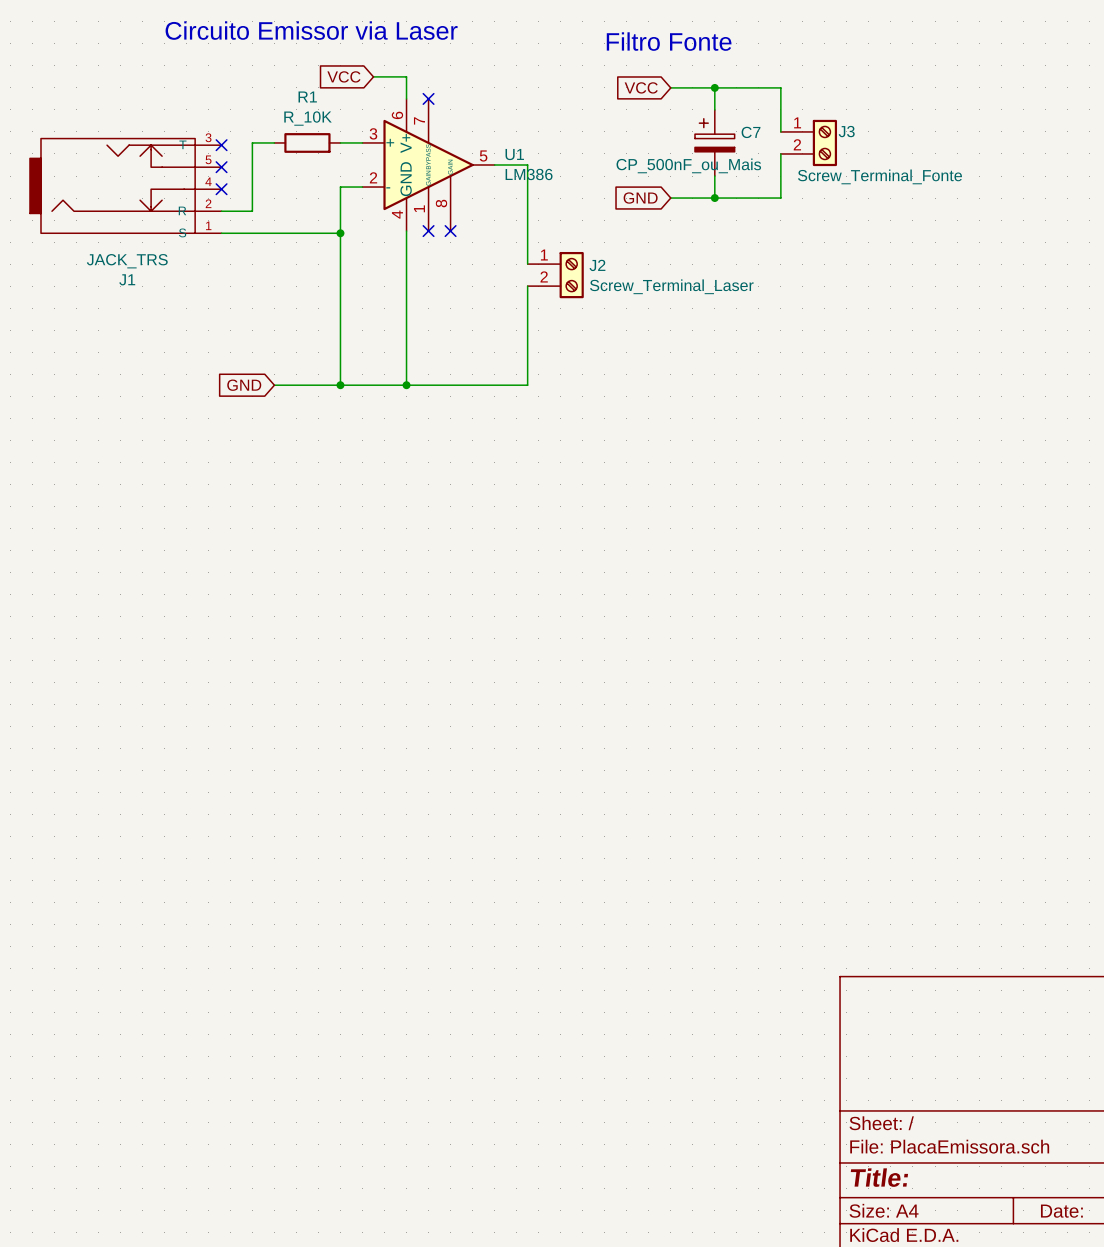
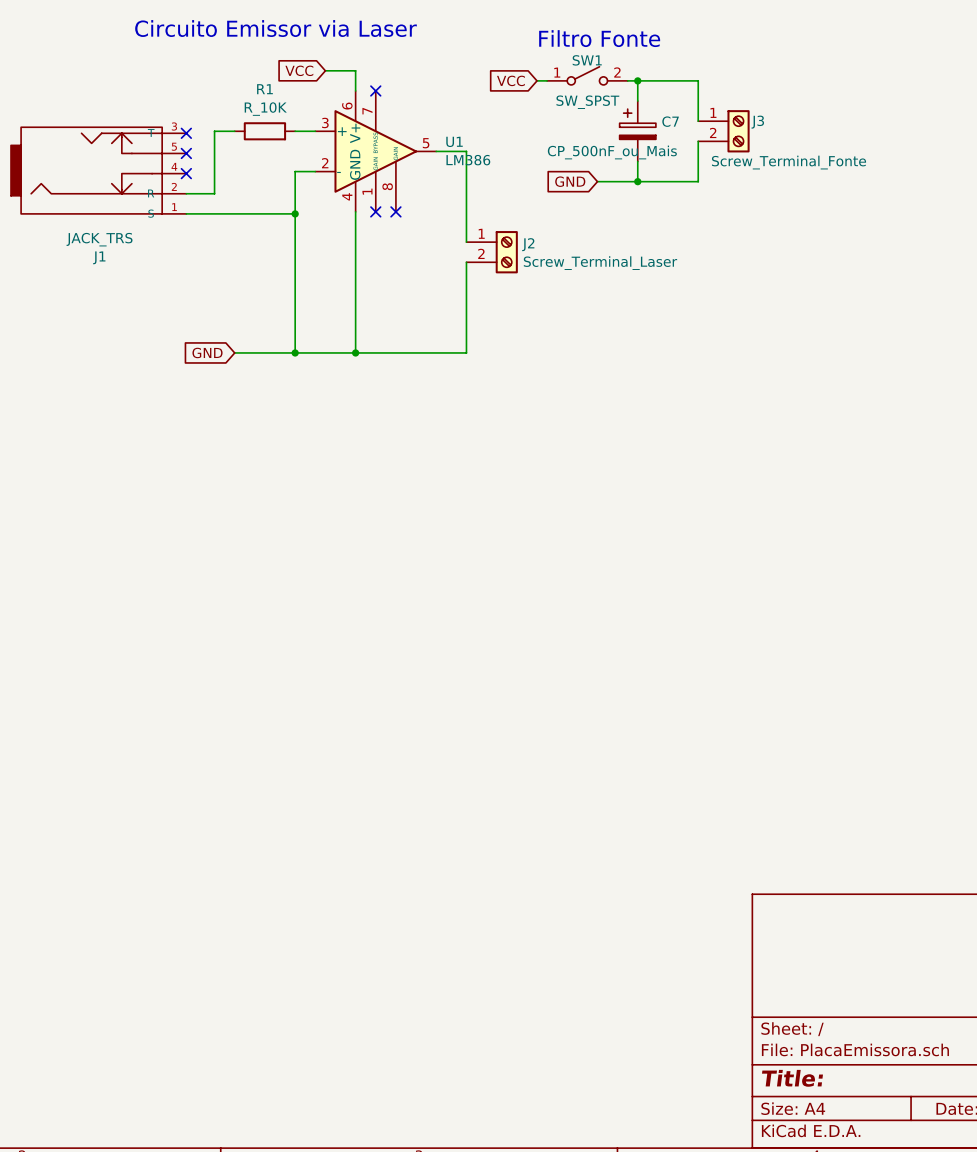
SW1: none -> SW_SPST (587, 75)
wire: none -> (537, 80) (547, 80)
global label position: VCC (641, 87) -> VCC (510, 80)

